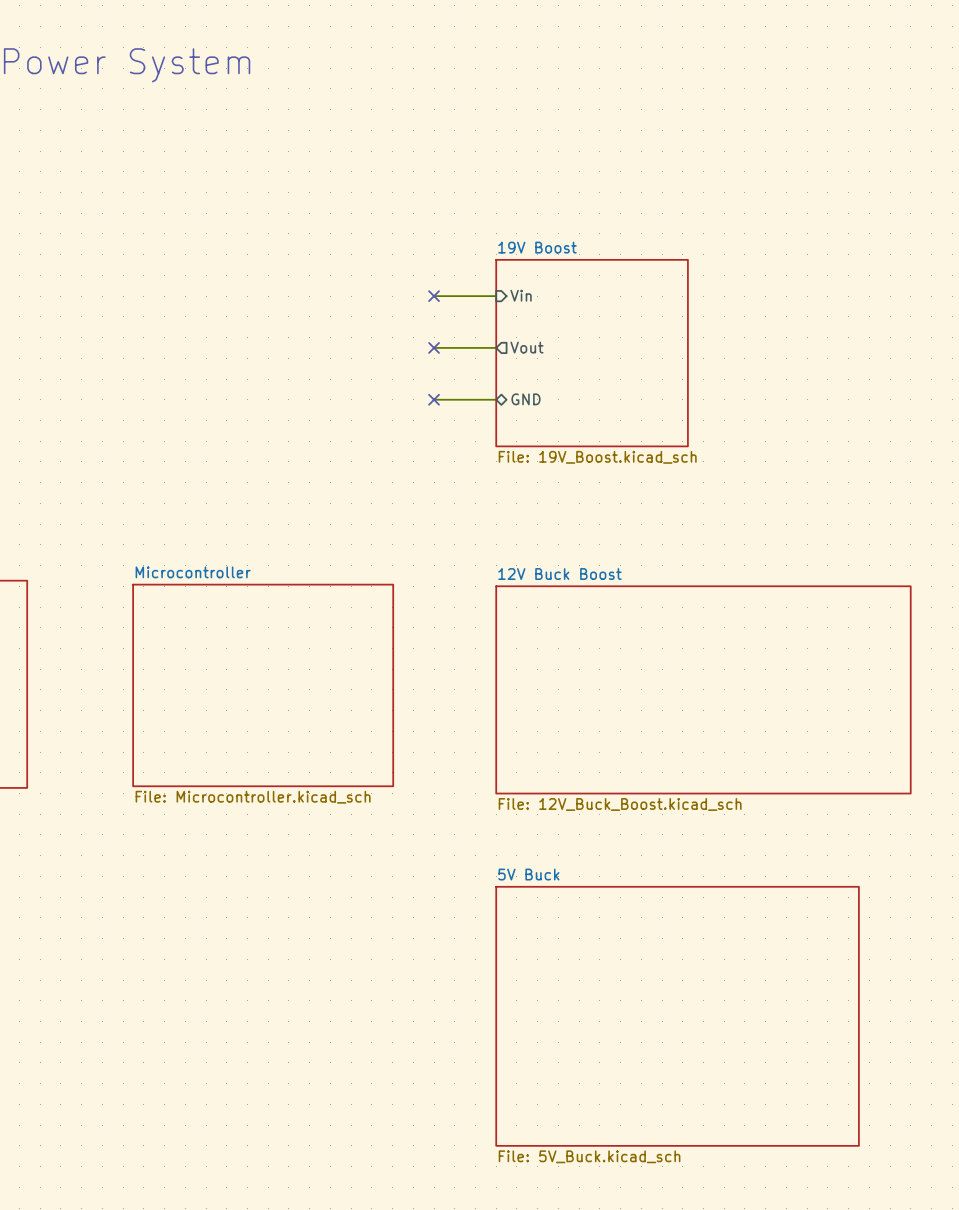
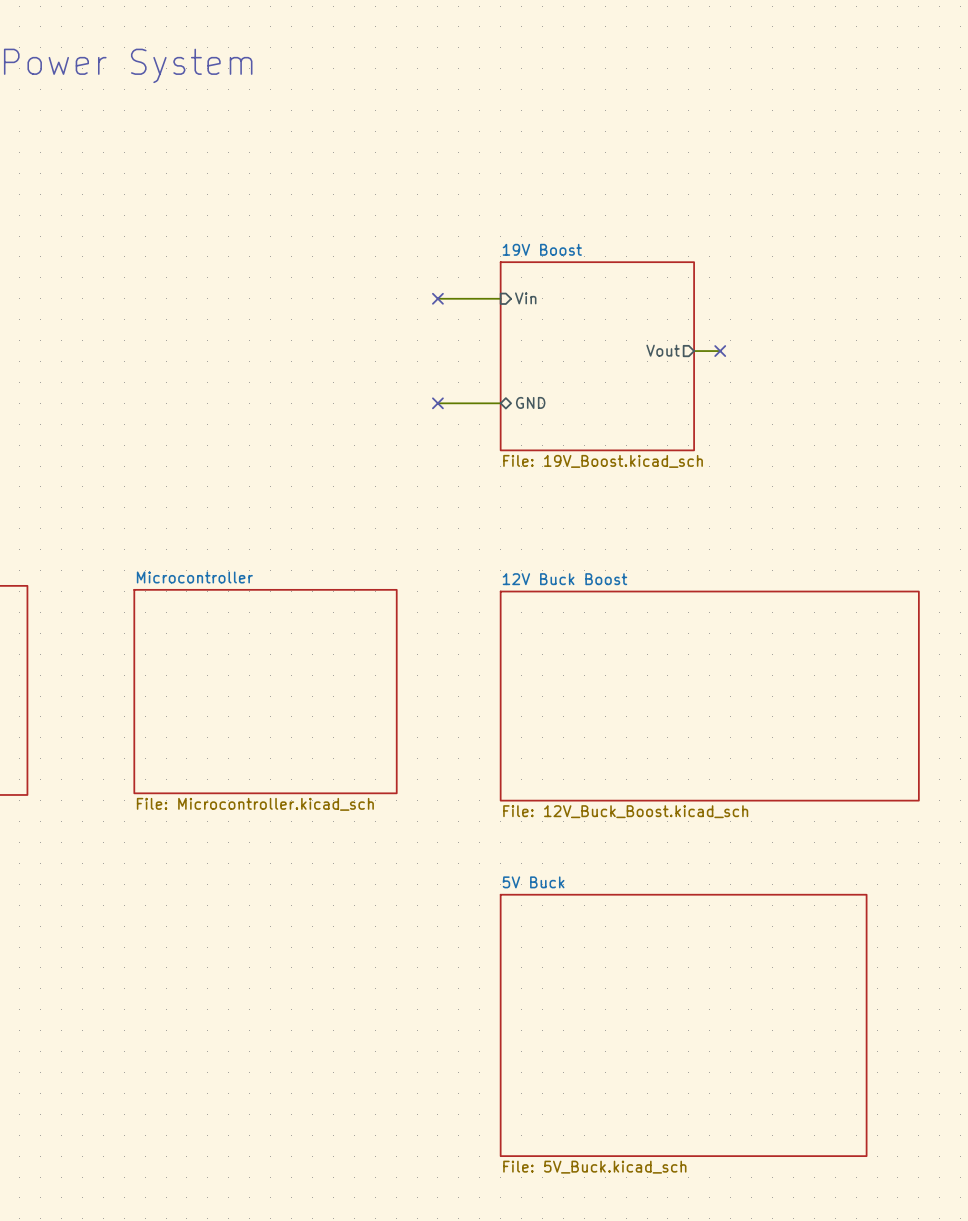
wire: (434, 347) (496, 347) -> none
no-connect mark: (434, 347) -> none
sheet pin rotation: 0° (526, 347) -> 180° (663, 350)
sheet pin position: Vout (526, 347) -> Vout (663, 350)
wire: none -> (694, 351) (720, 351)
no-connect mark: none -> (720, 351)

